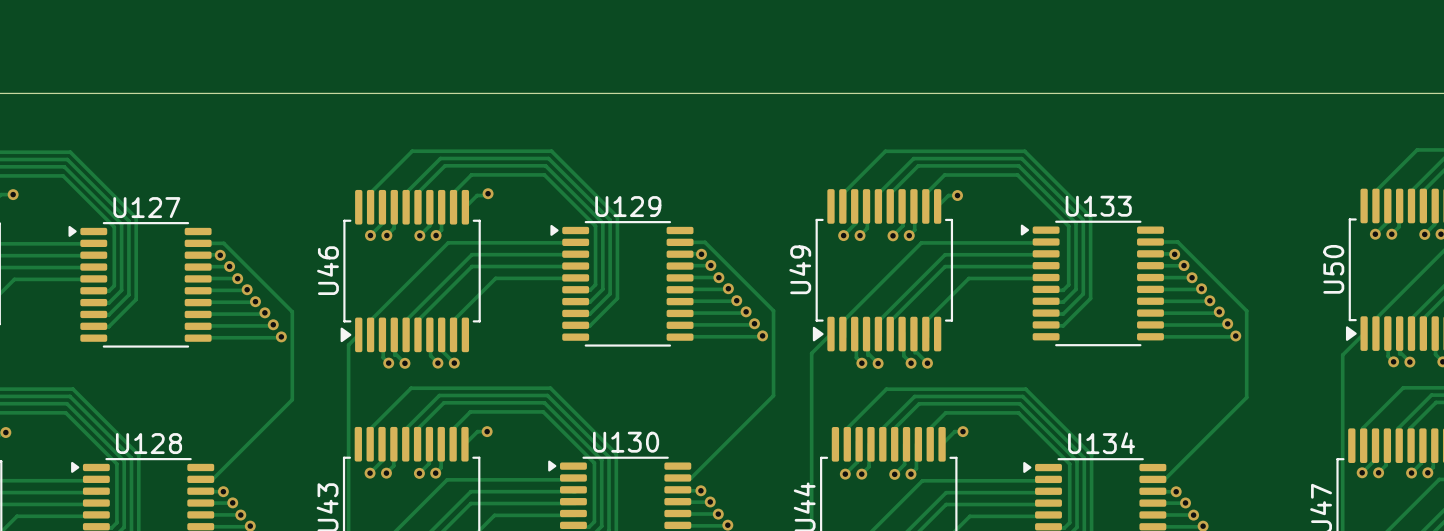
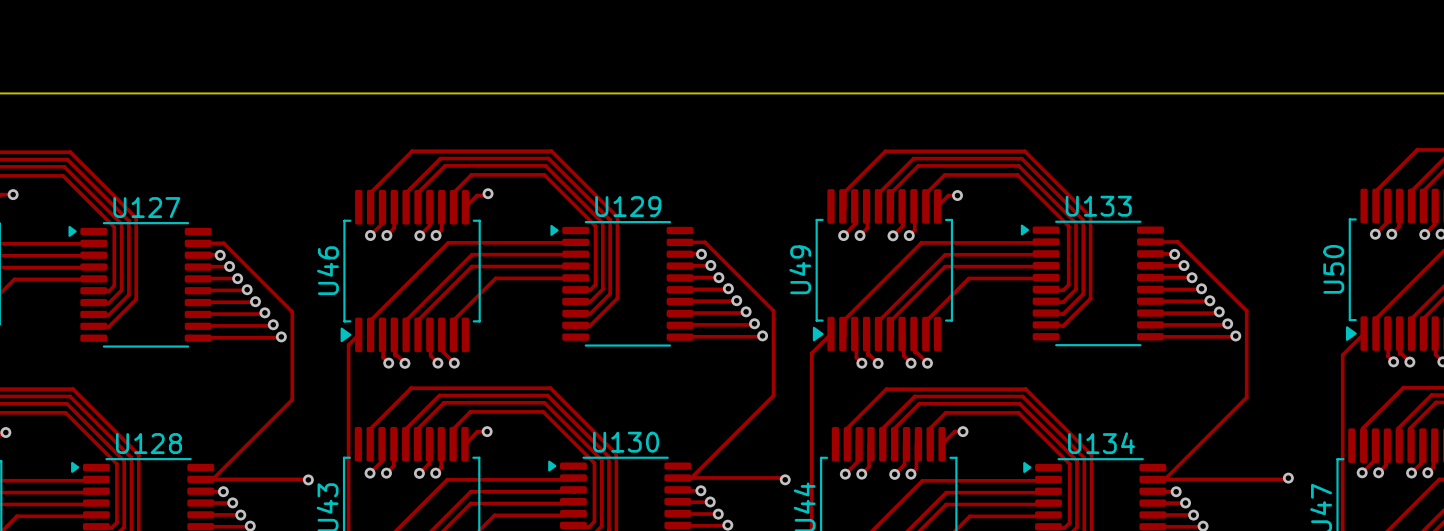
track: none -> (691, 477) (783, 477) (785, 479)
track: none -> (1288, 478) (1164, 479)
via: none -> (1288, 478)
track: none -> (212, 479) (308, 479)
via: none -> (308, 479)
via: none -> (785, 479)

